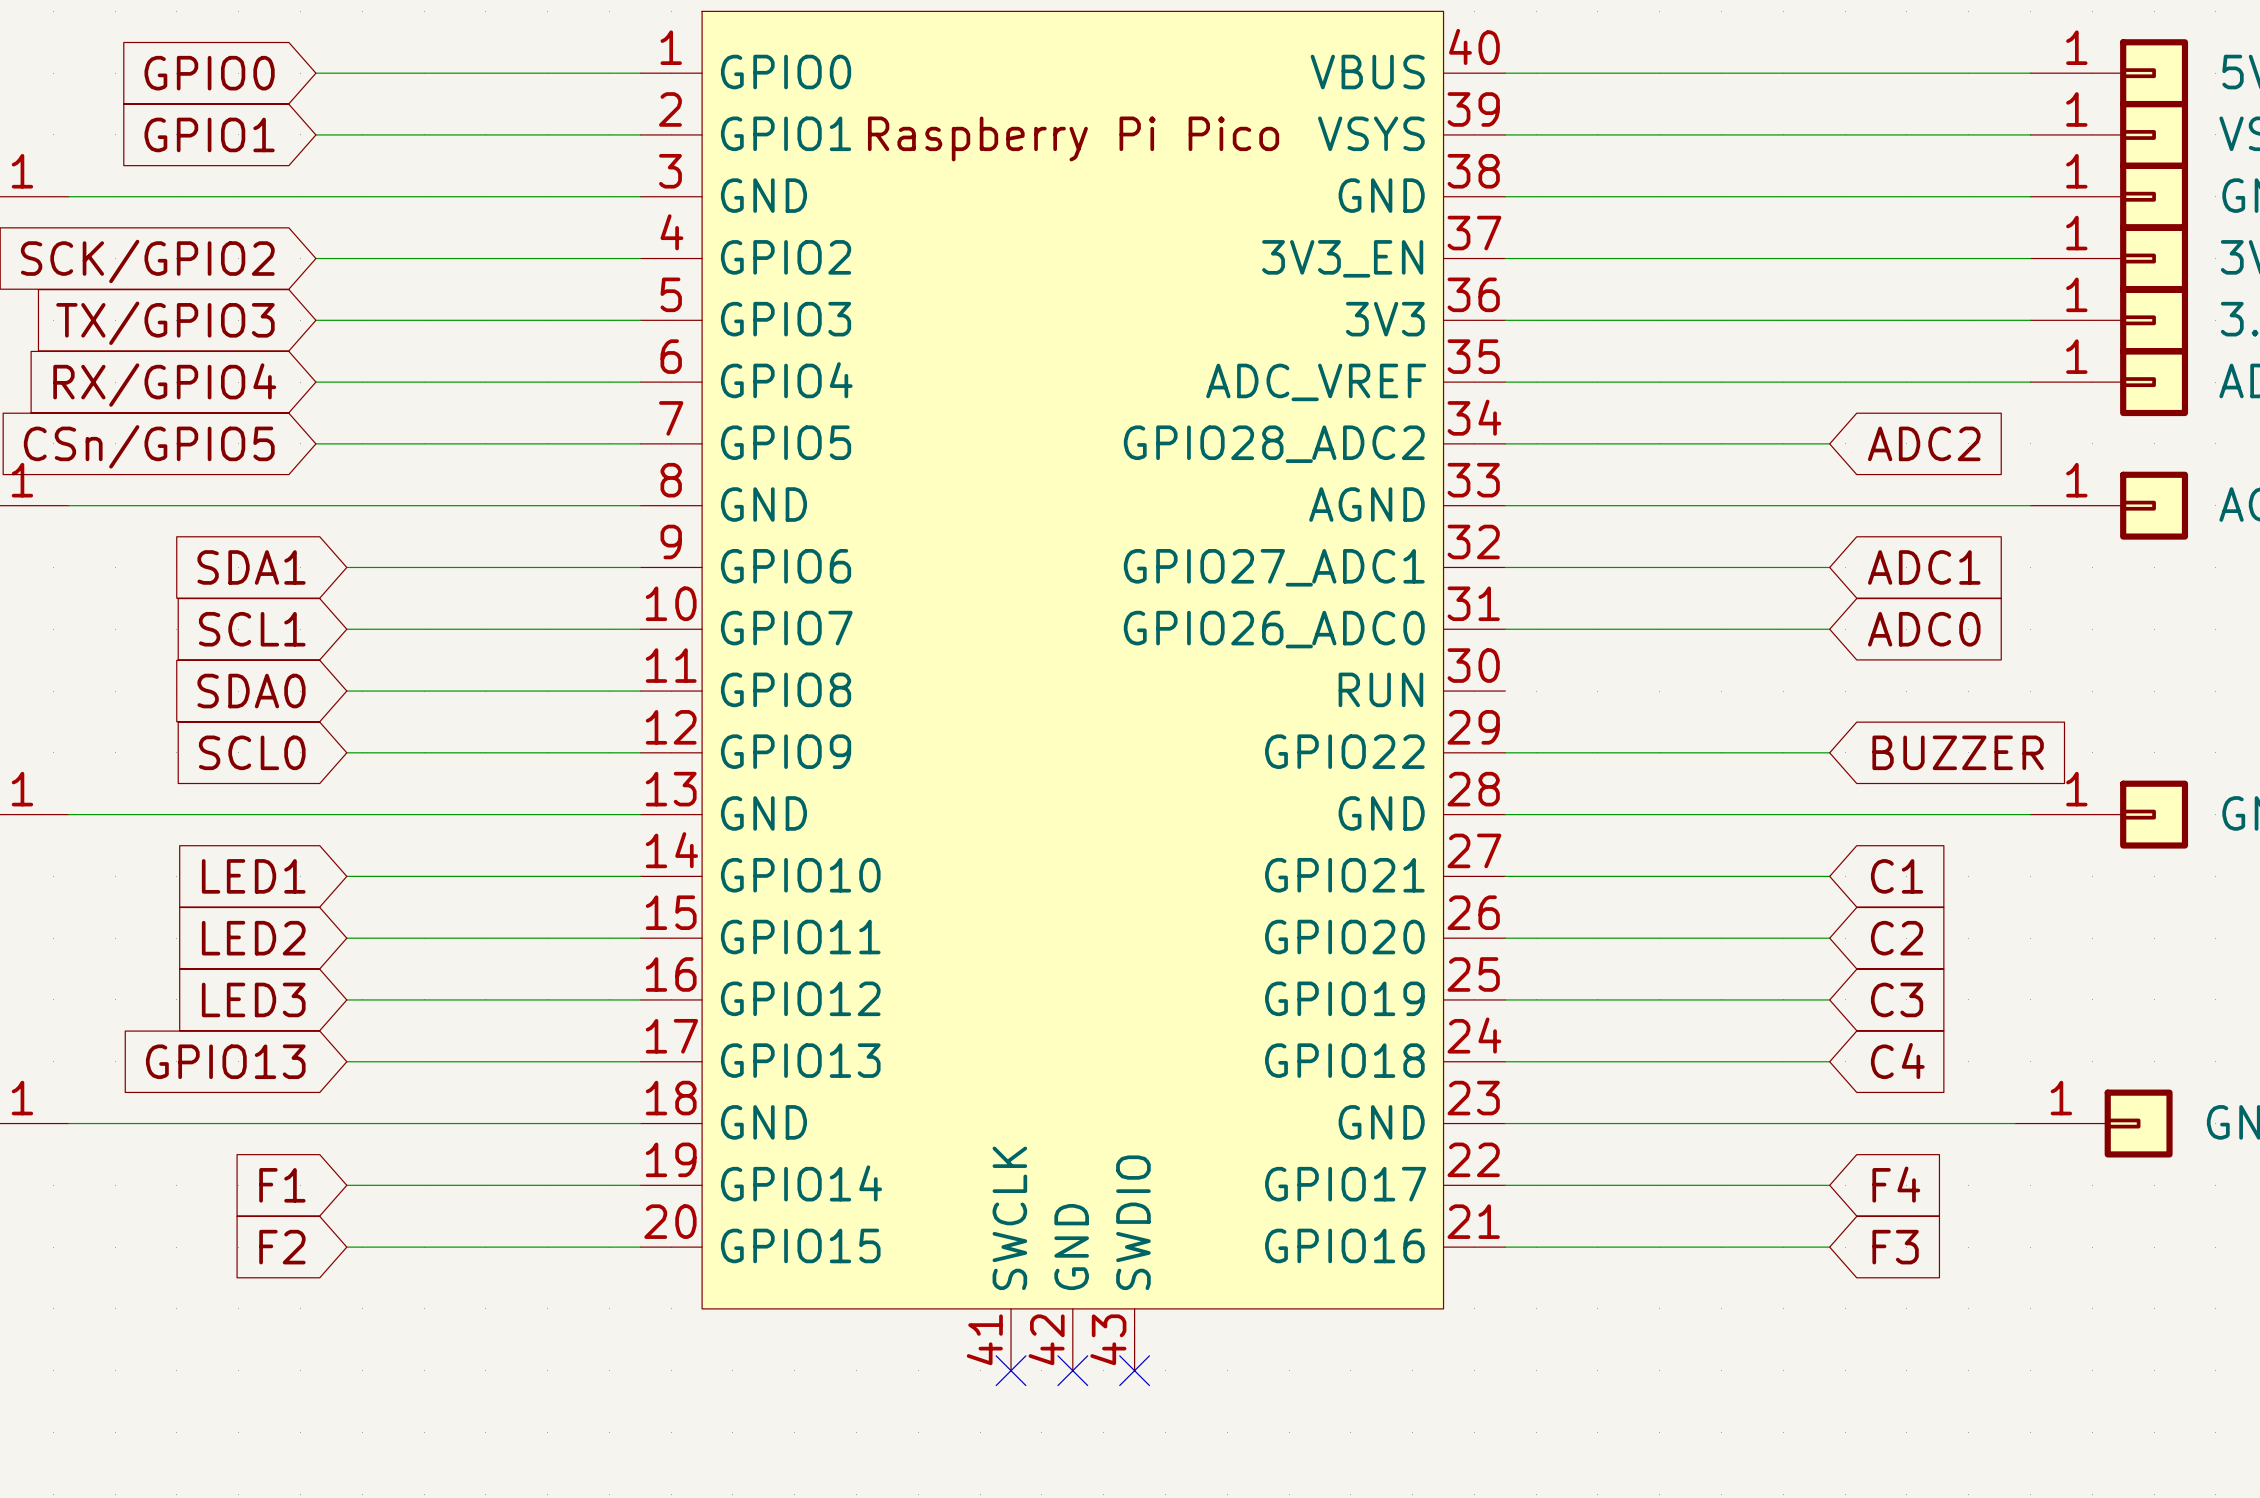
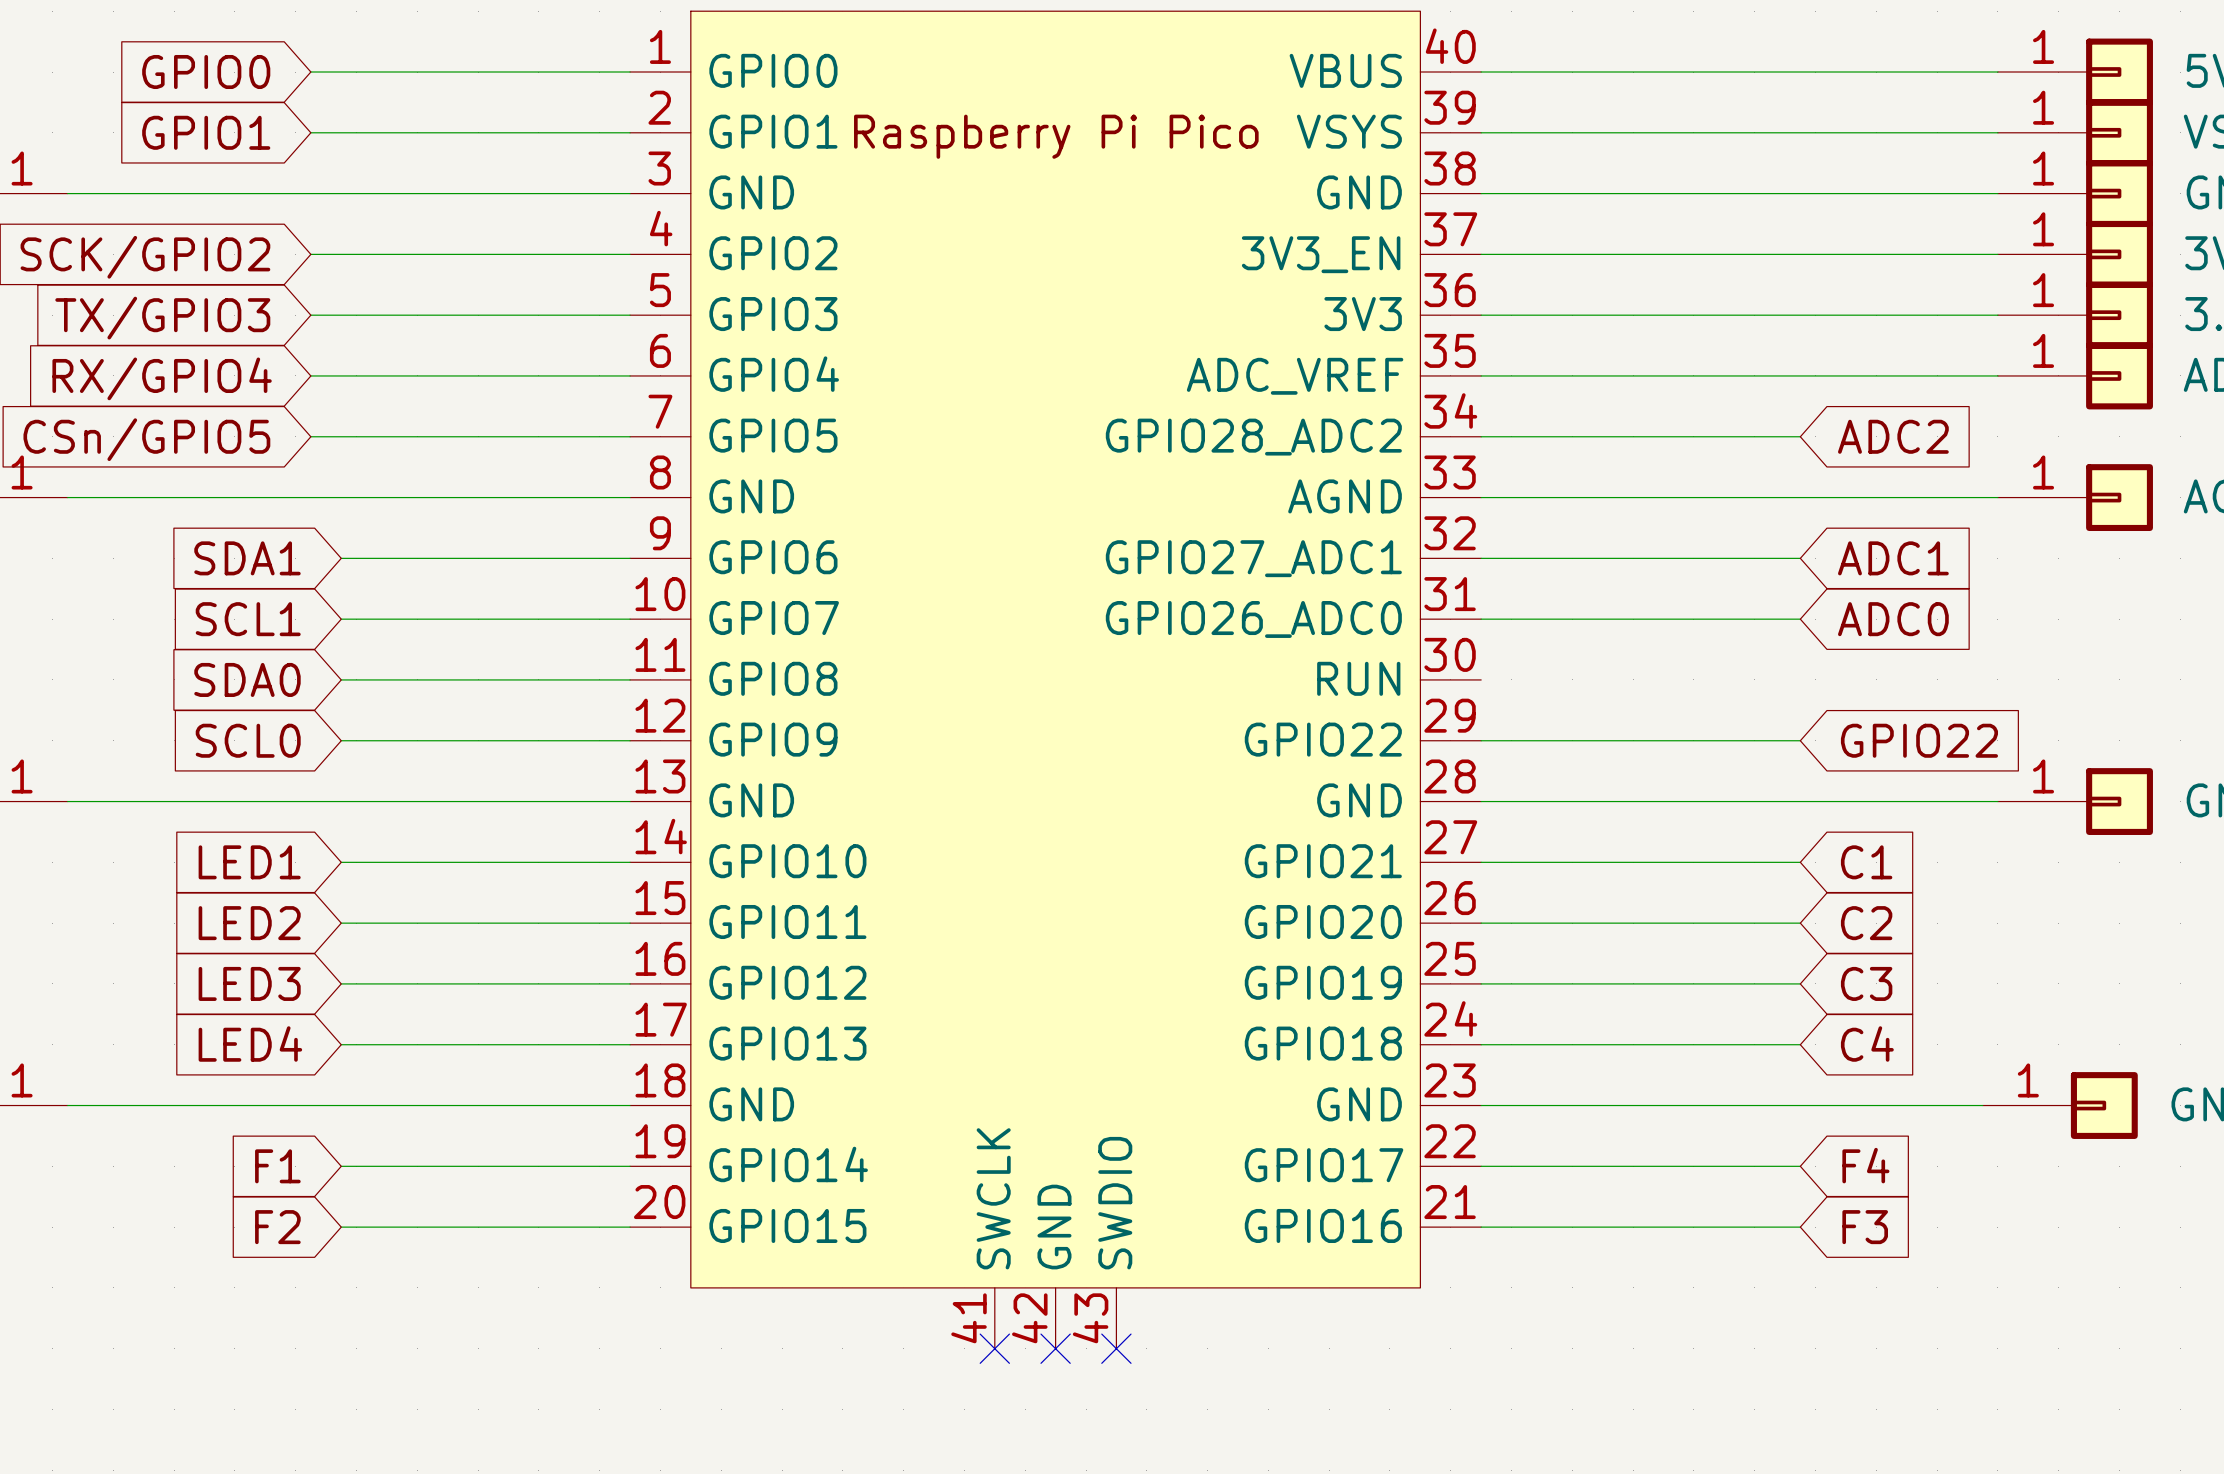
global label: BUZZER (1958, 752) -> GPIO22 (1919, 740)
global label: GPIO13 (225, 1061) -> LED4 (250, 1044)

